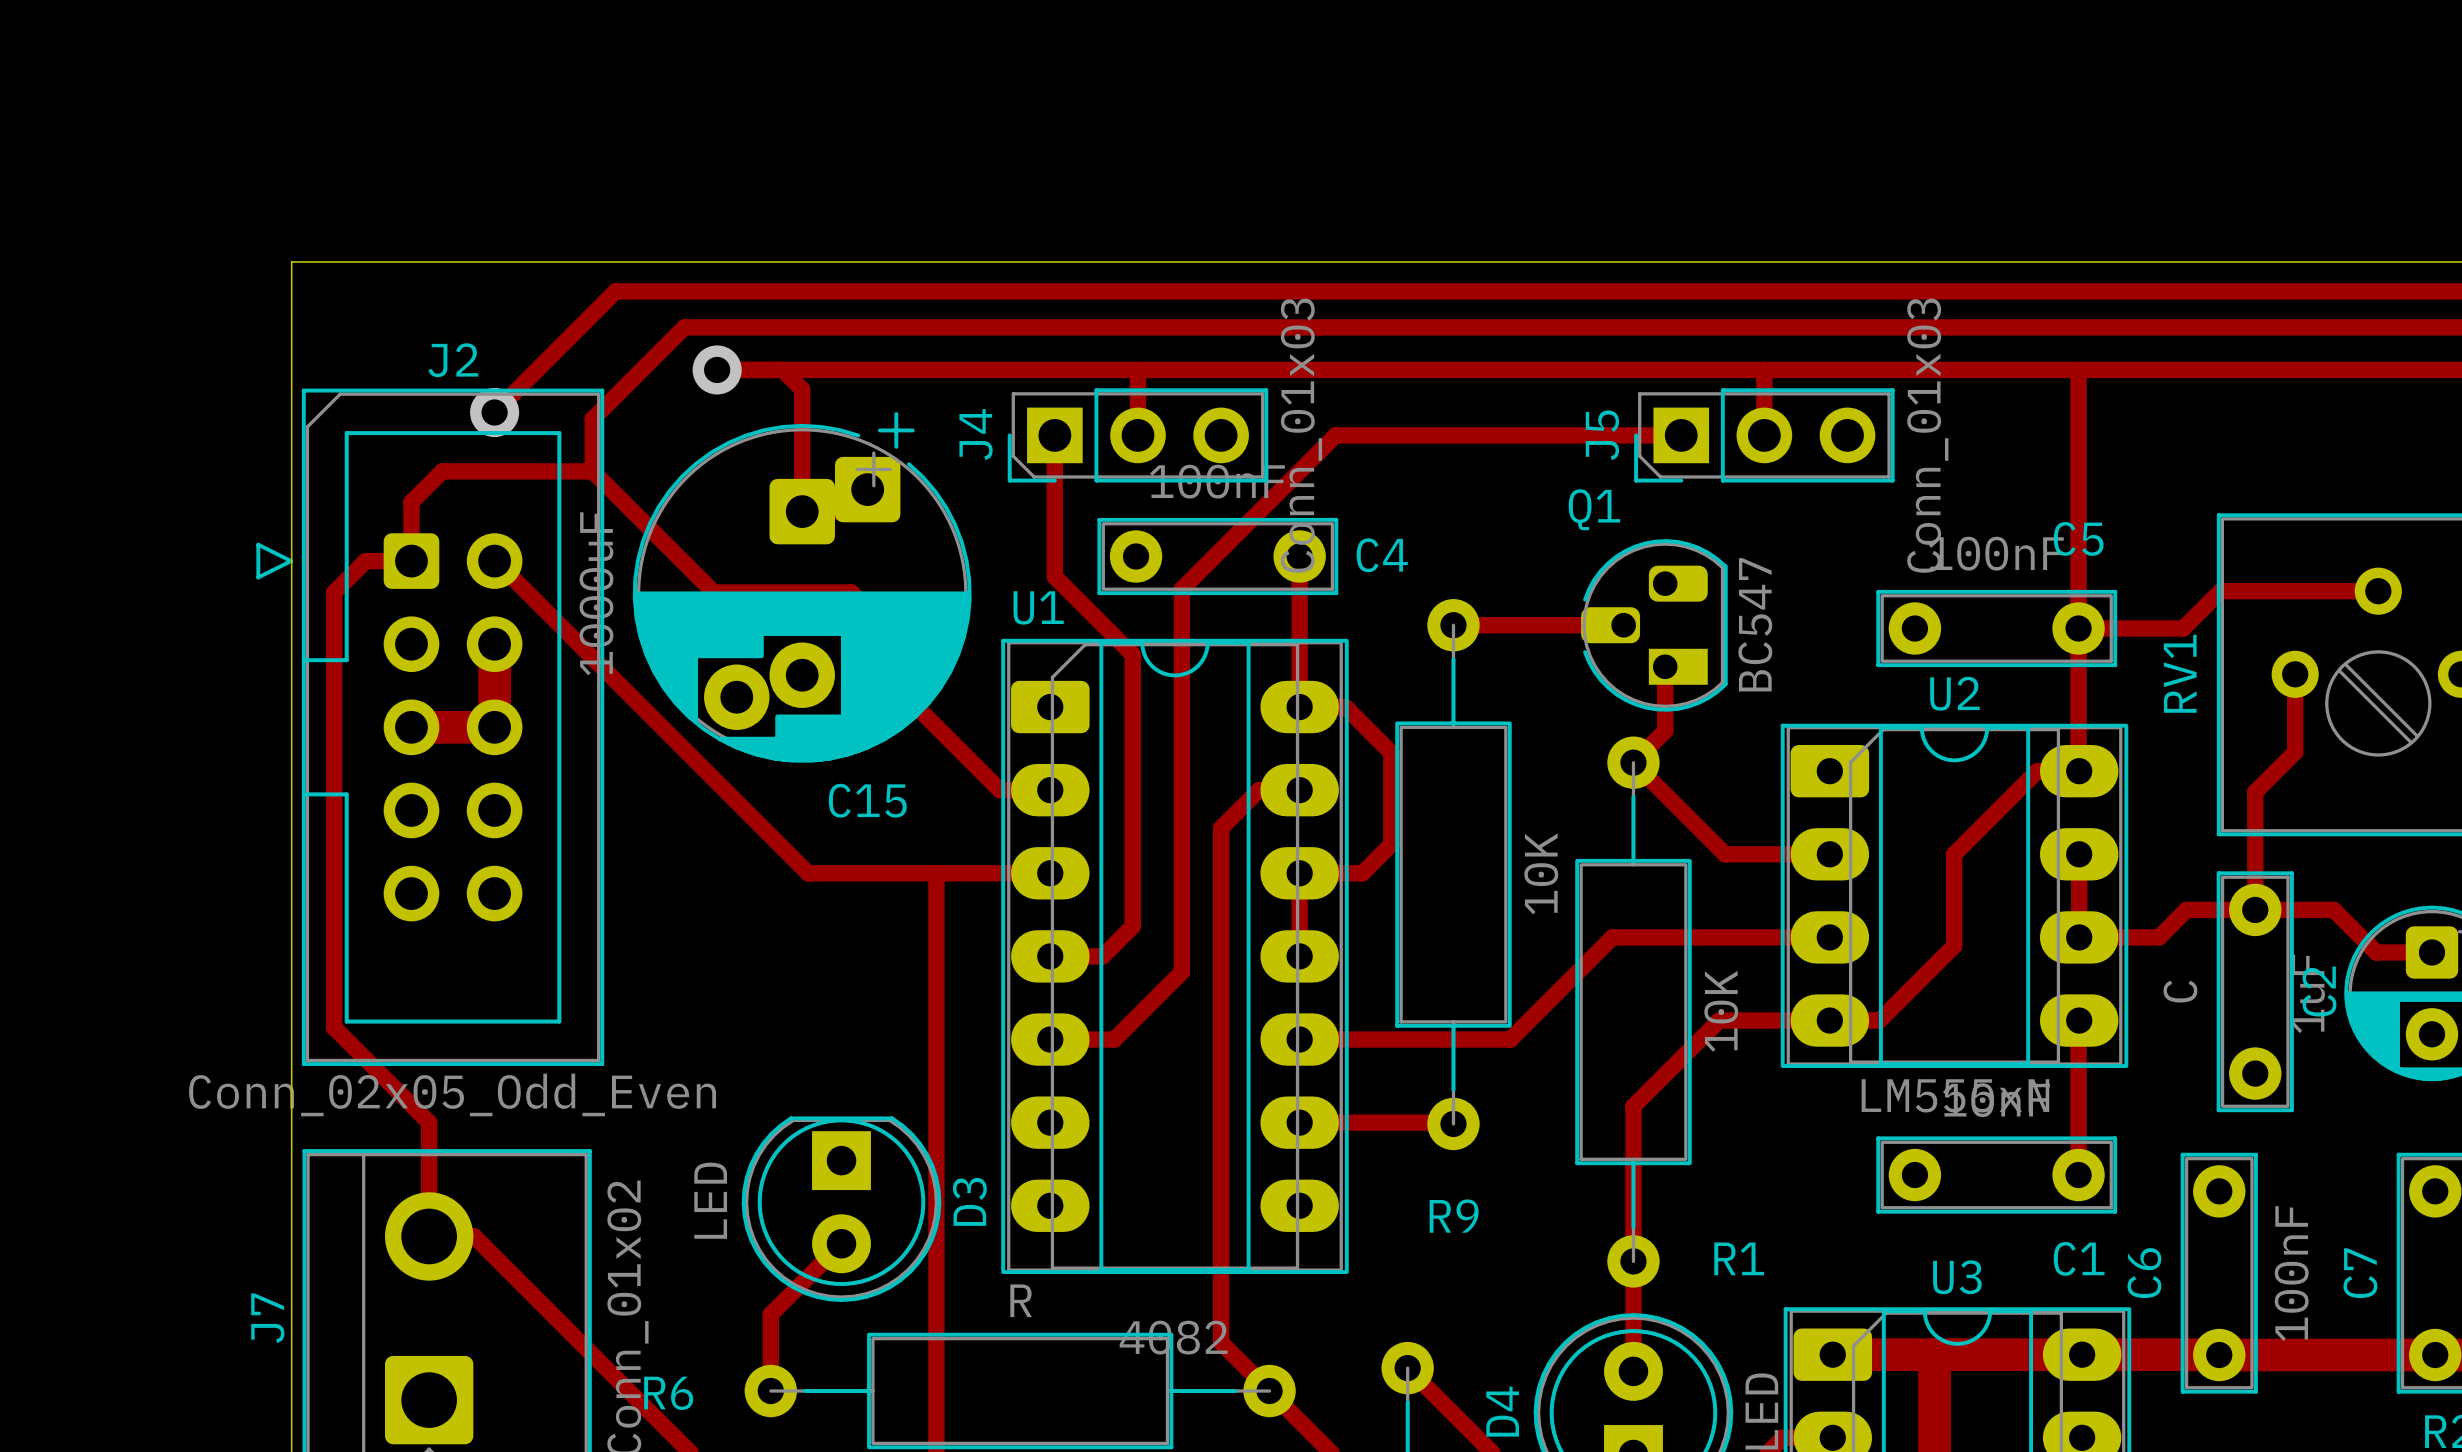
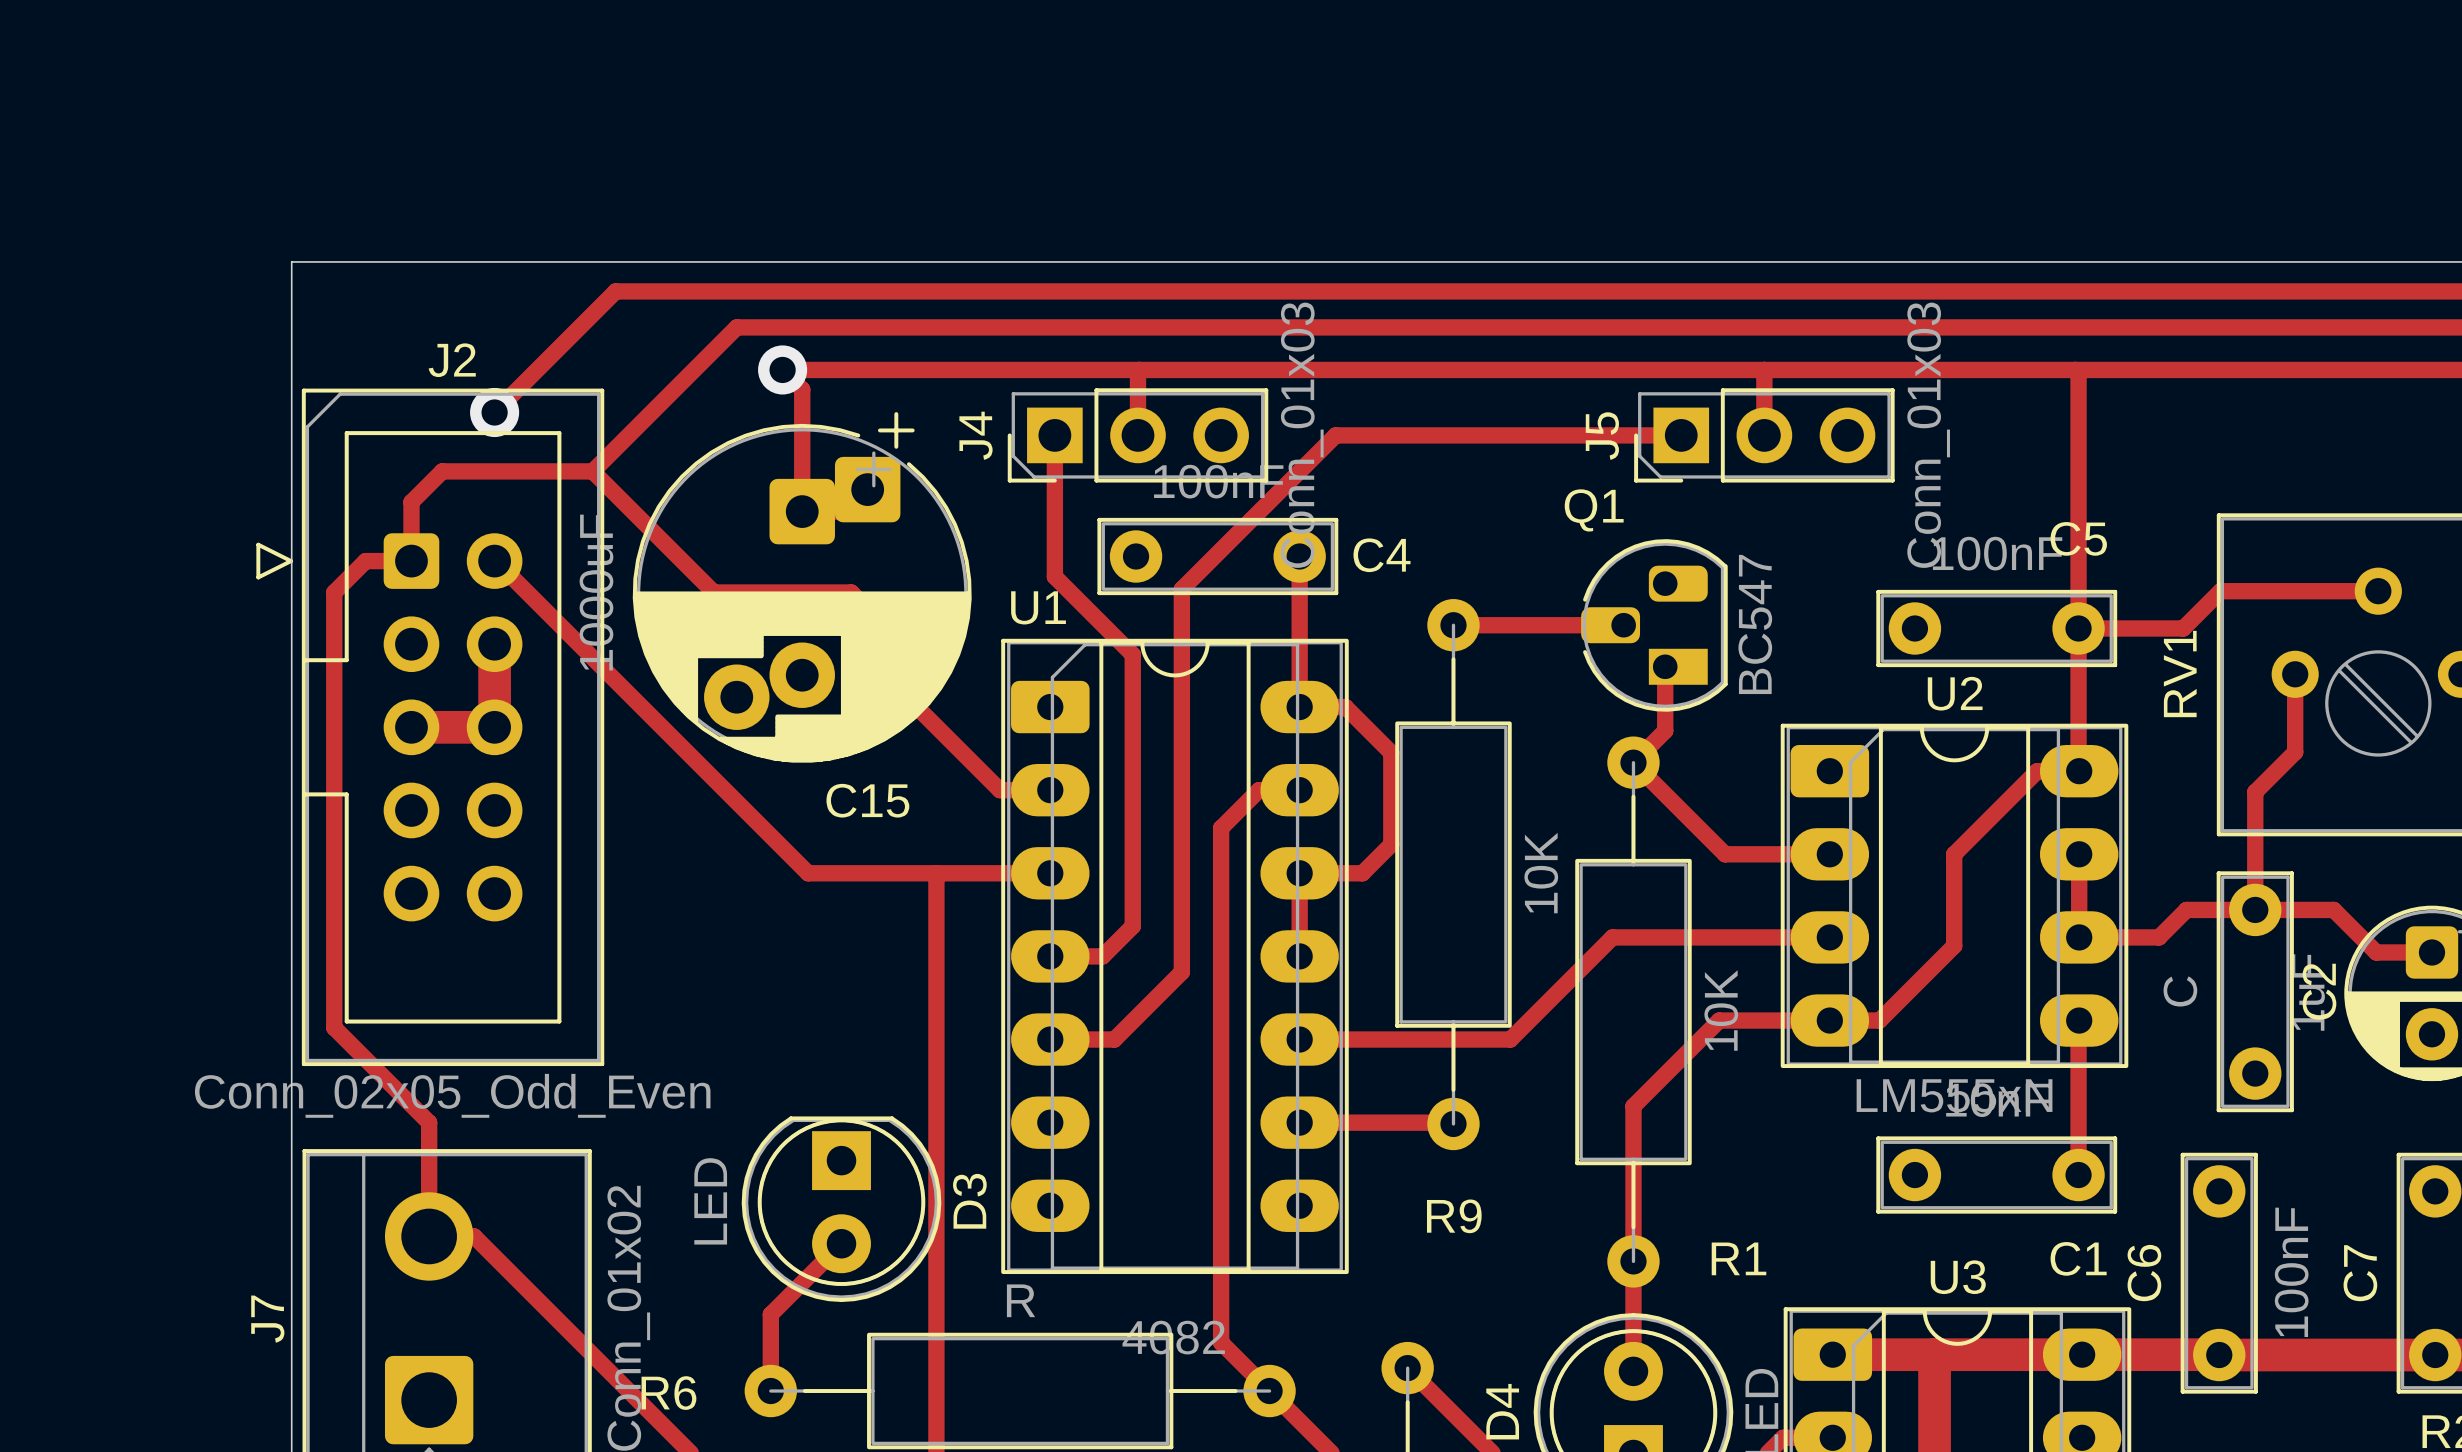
track: (736, 327) (684, 327) (592, 419) (592, 471) -> (736, 327) (592, 471)
track: (717, 369) (782, 369) -> none
via position: (717, 369) -> (782, 369)

